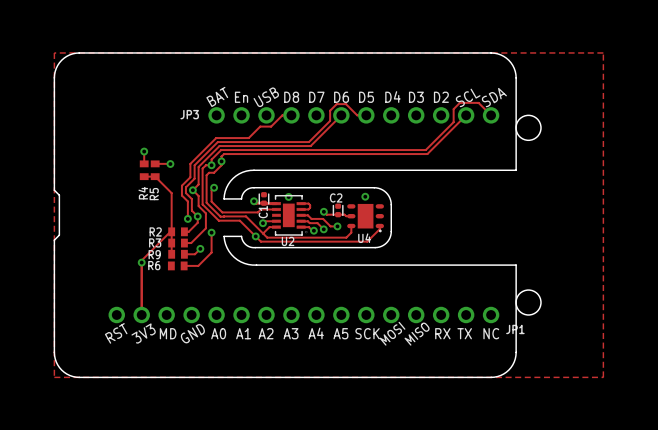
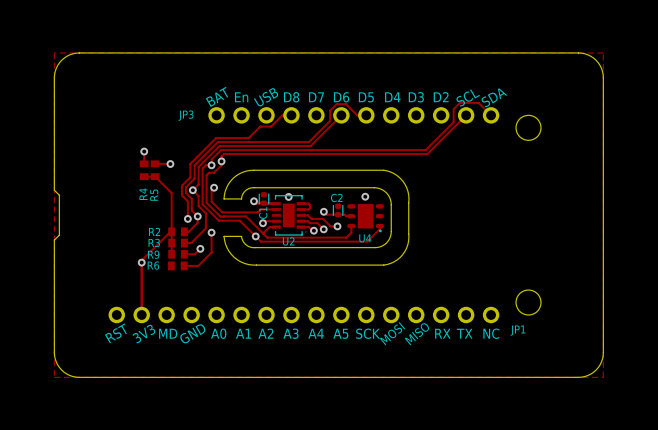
board edge: (491, 52) (506, 58) (515, 71) (516, 170) (383, 170) -> (491, 52) (584, 53) (598, 62) (603, 77) (603, 352) (601, 361) (593, 372) (581, 377) (491, 377)
board edge: (383, 265) (516, 265) (515, 358) (506, 372) (491, 377) -> (383, 265) (397, 259) (406, 248) (408, 237) (408, 198) (402, 181) (394, 173) (383, 170)

